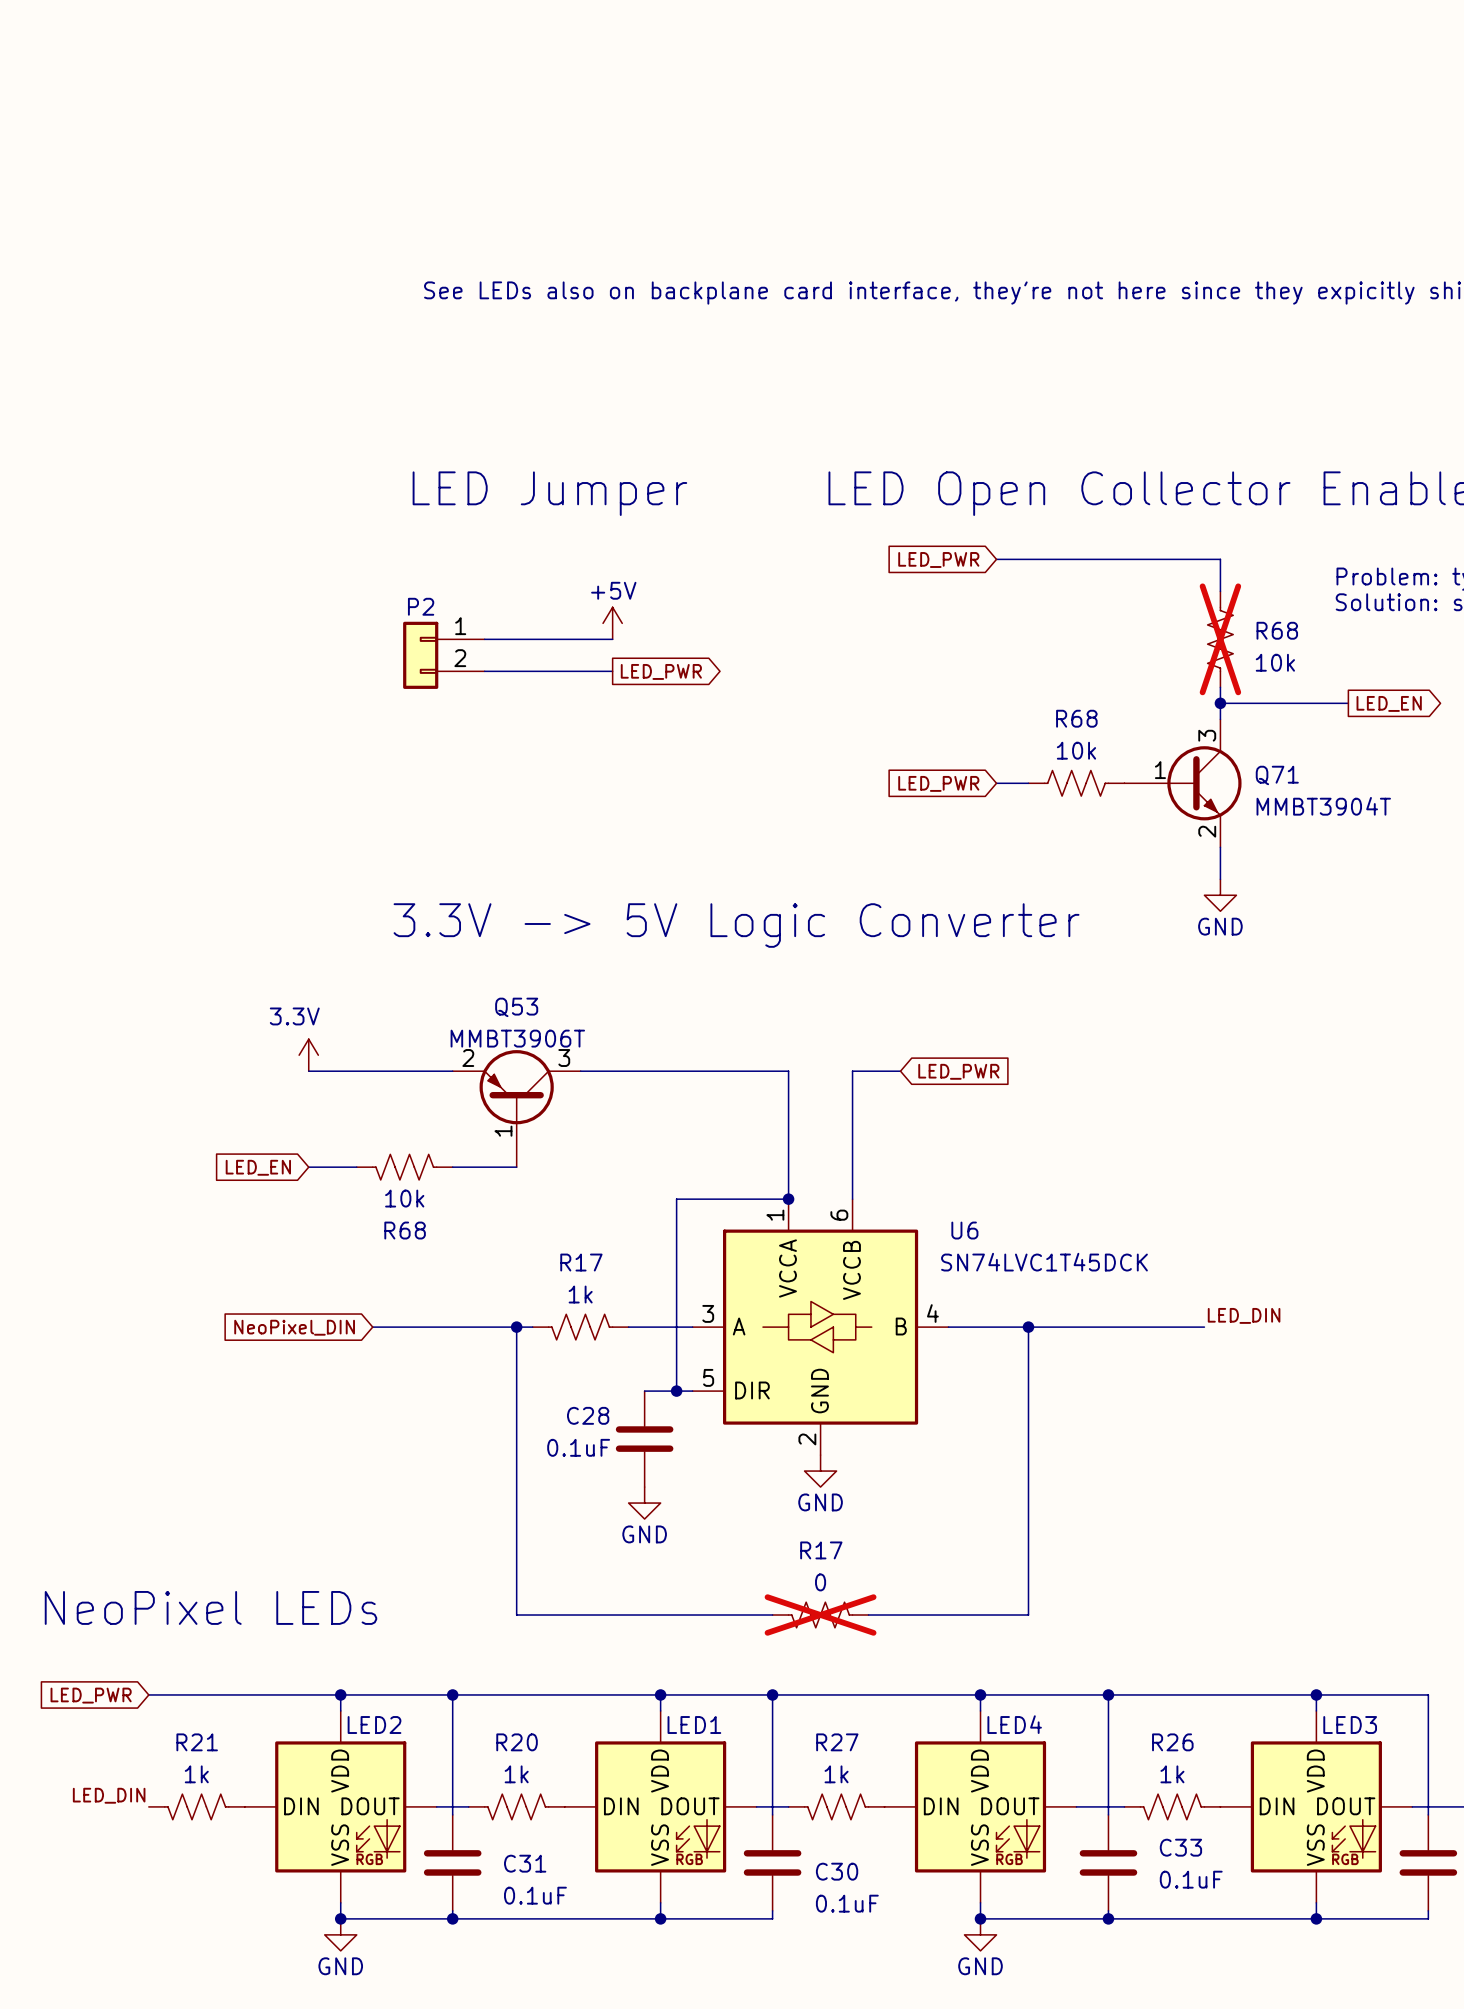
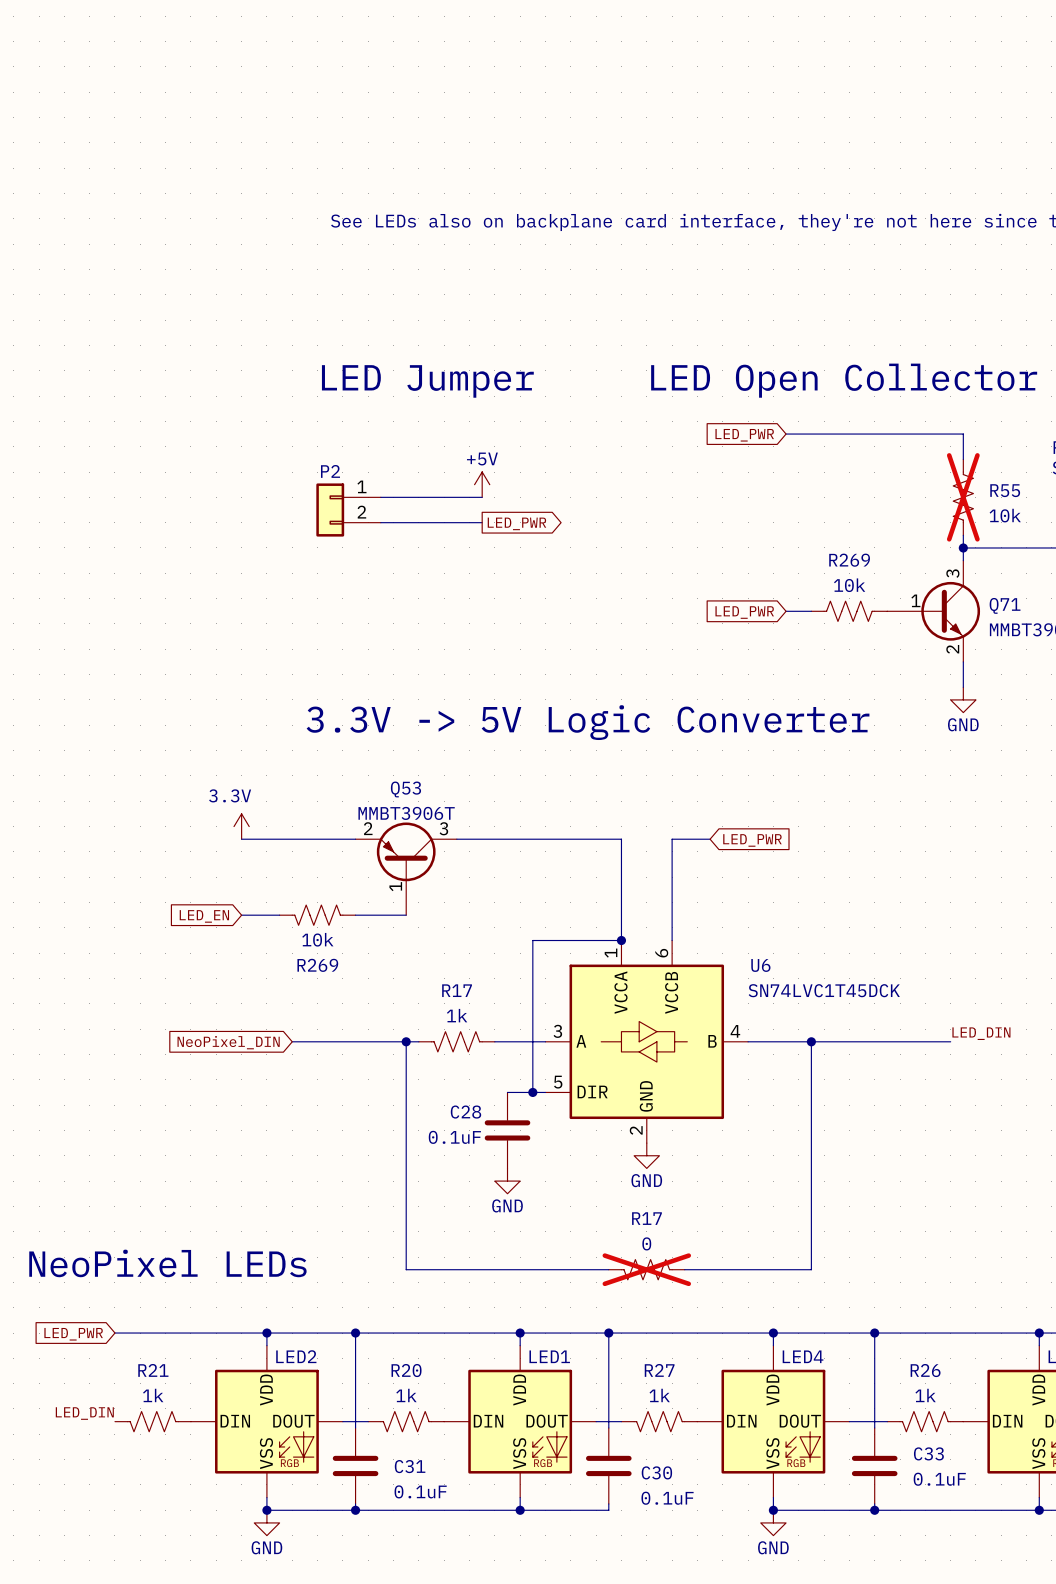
R68 name: R68 (1277, 630) -> R55 (1005, 490)
R68 name: R68 (1076, 718) -> R269 (849, 560)
R68 name: R68 (405, 1230) -> R269 (317, 965)

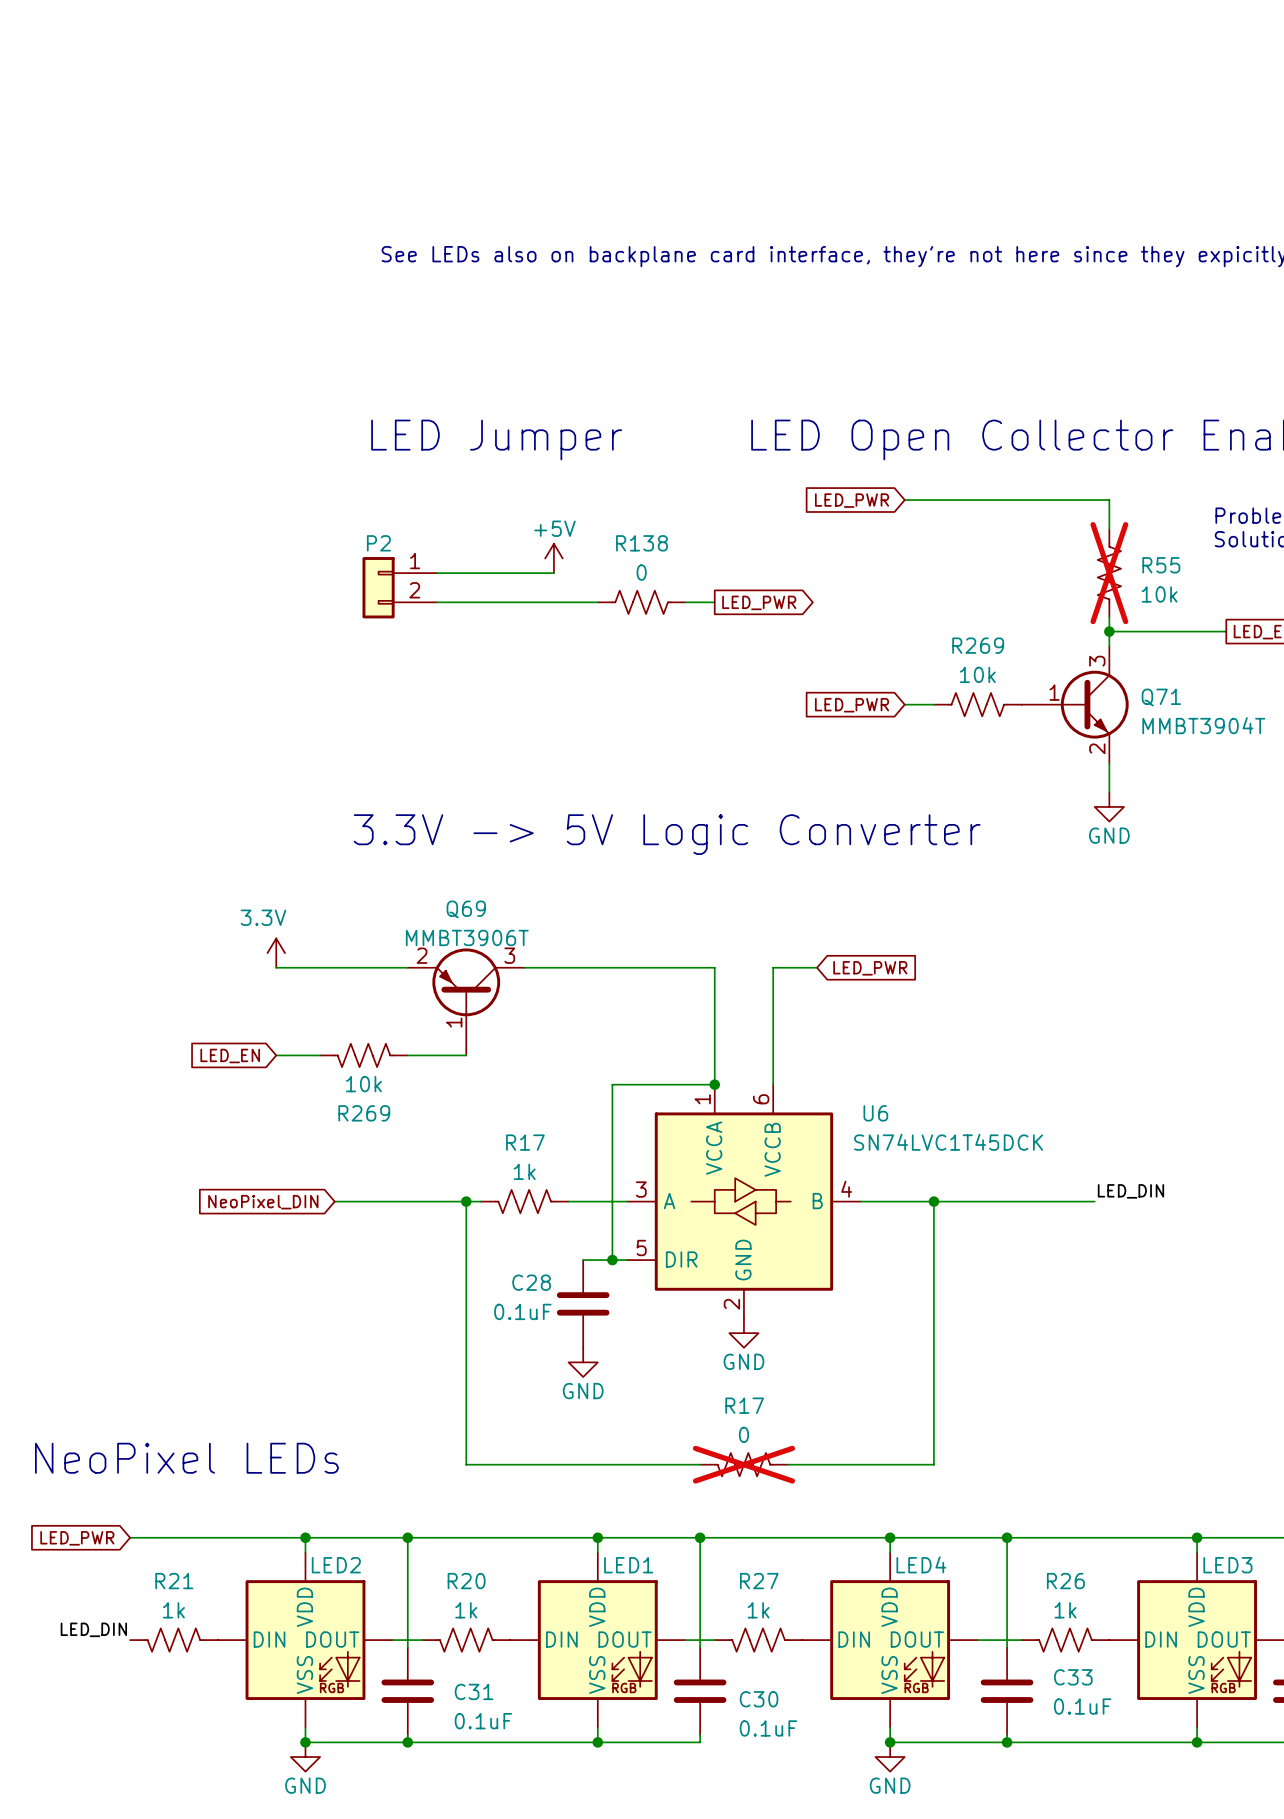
wire: none -> (553, 602) (597, 602)
R138: none -> 0 (641, 602)
wire: none -> (685, 602) (714, 602)
global label position: LED_PWR (516, 523) -> LED_PWR (759, 602)
Q53 name: Q53 (405, 789) -> Q69 (466, 909)

